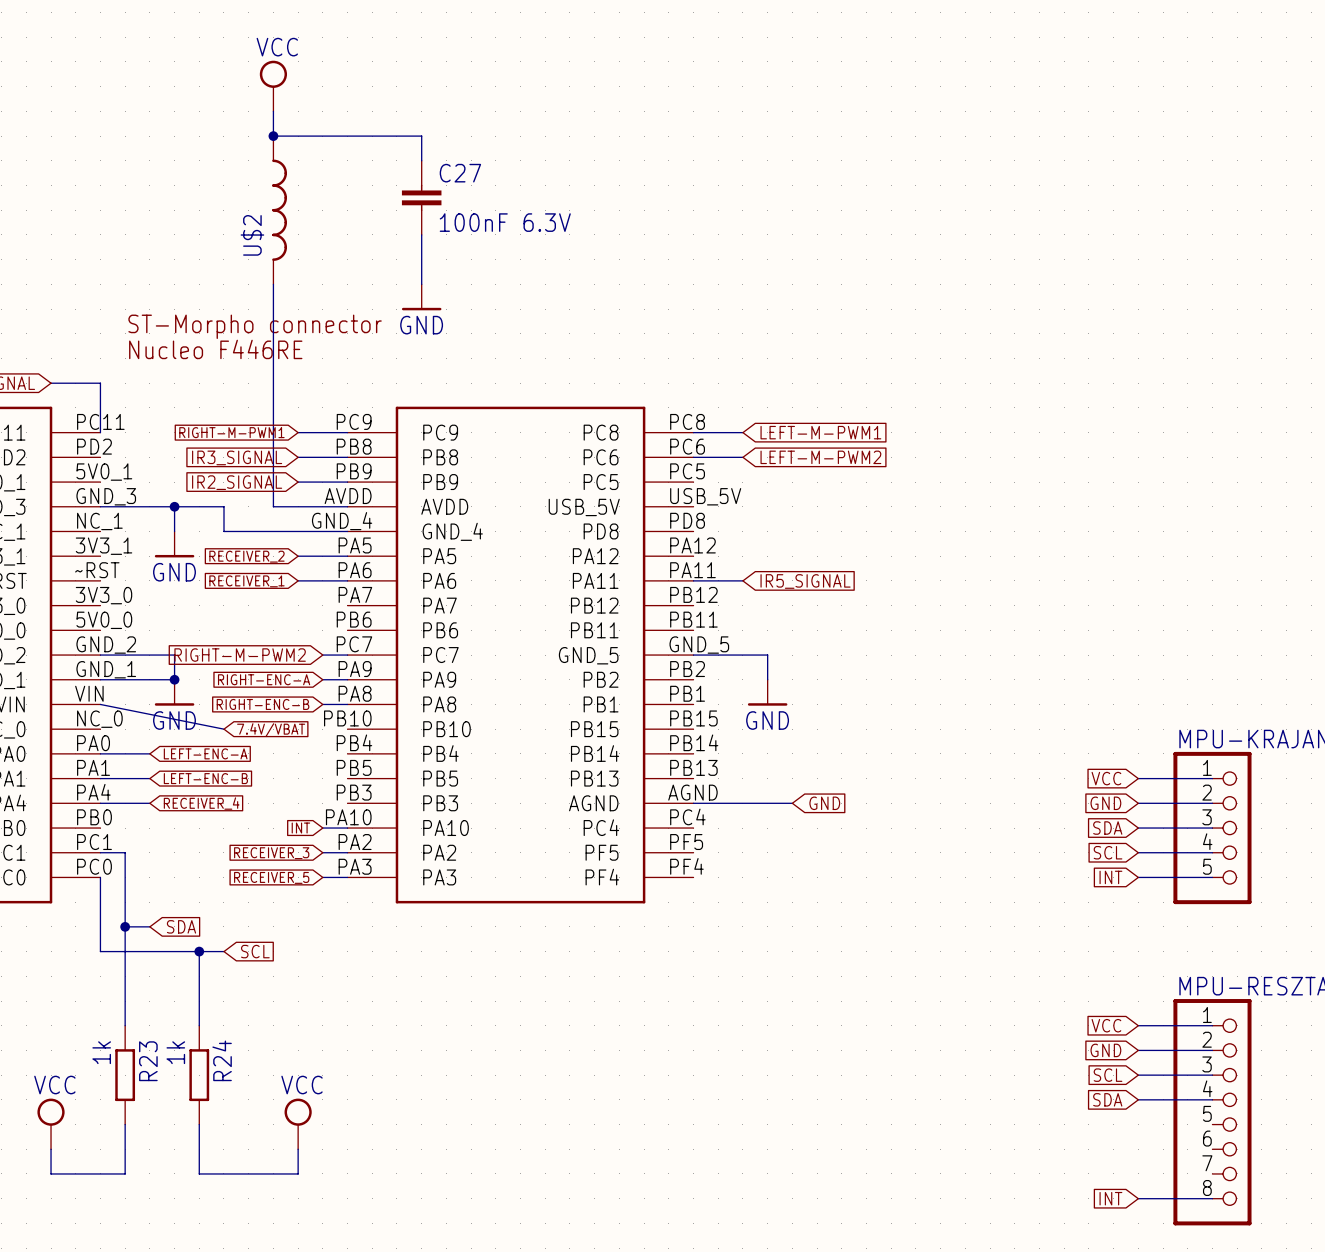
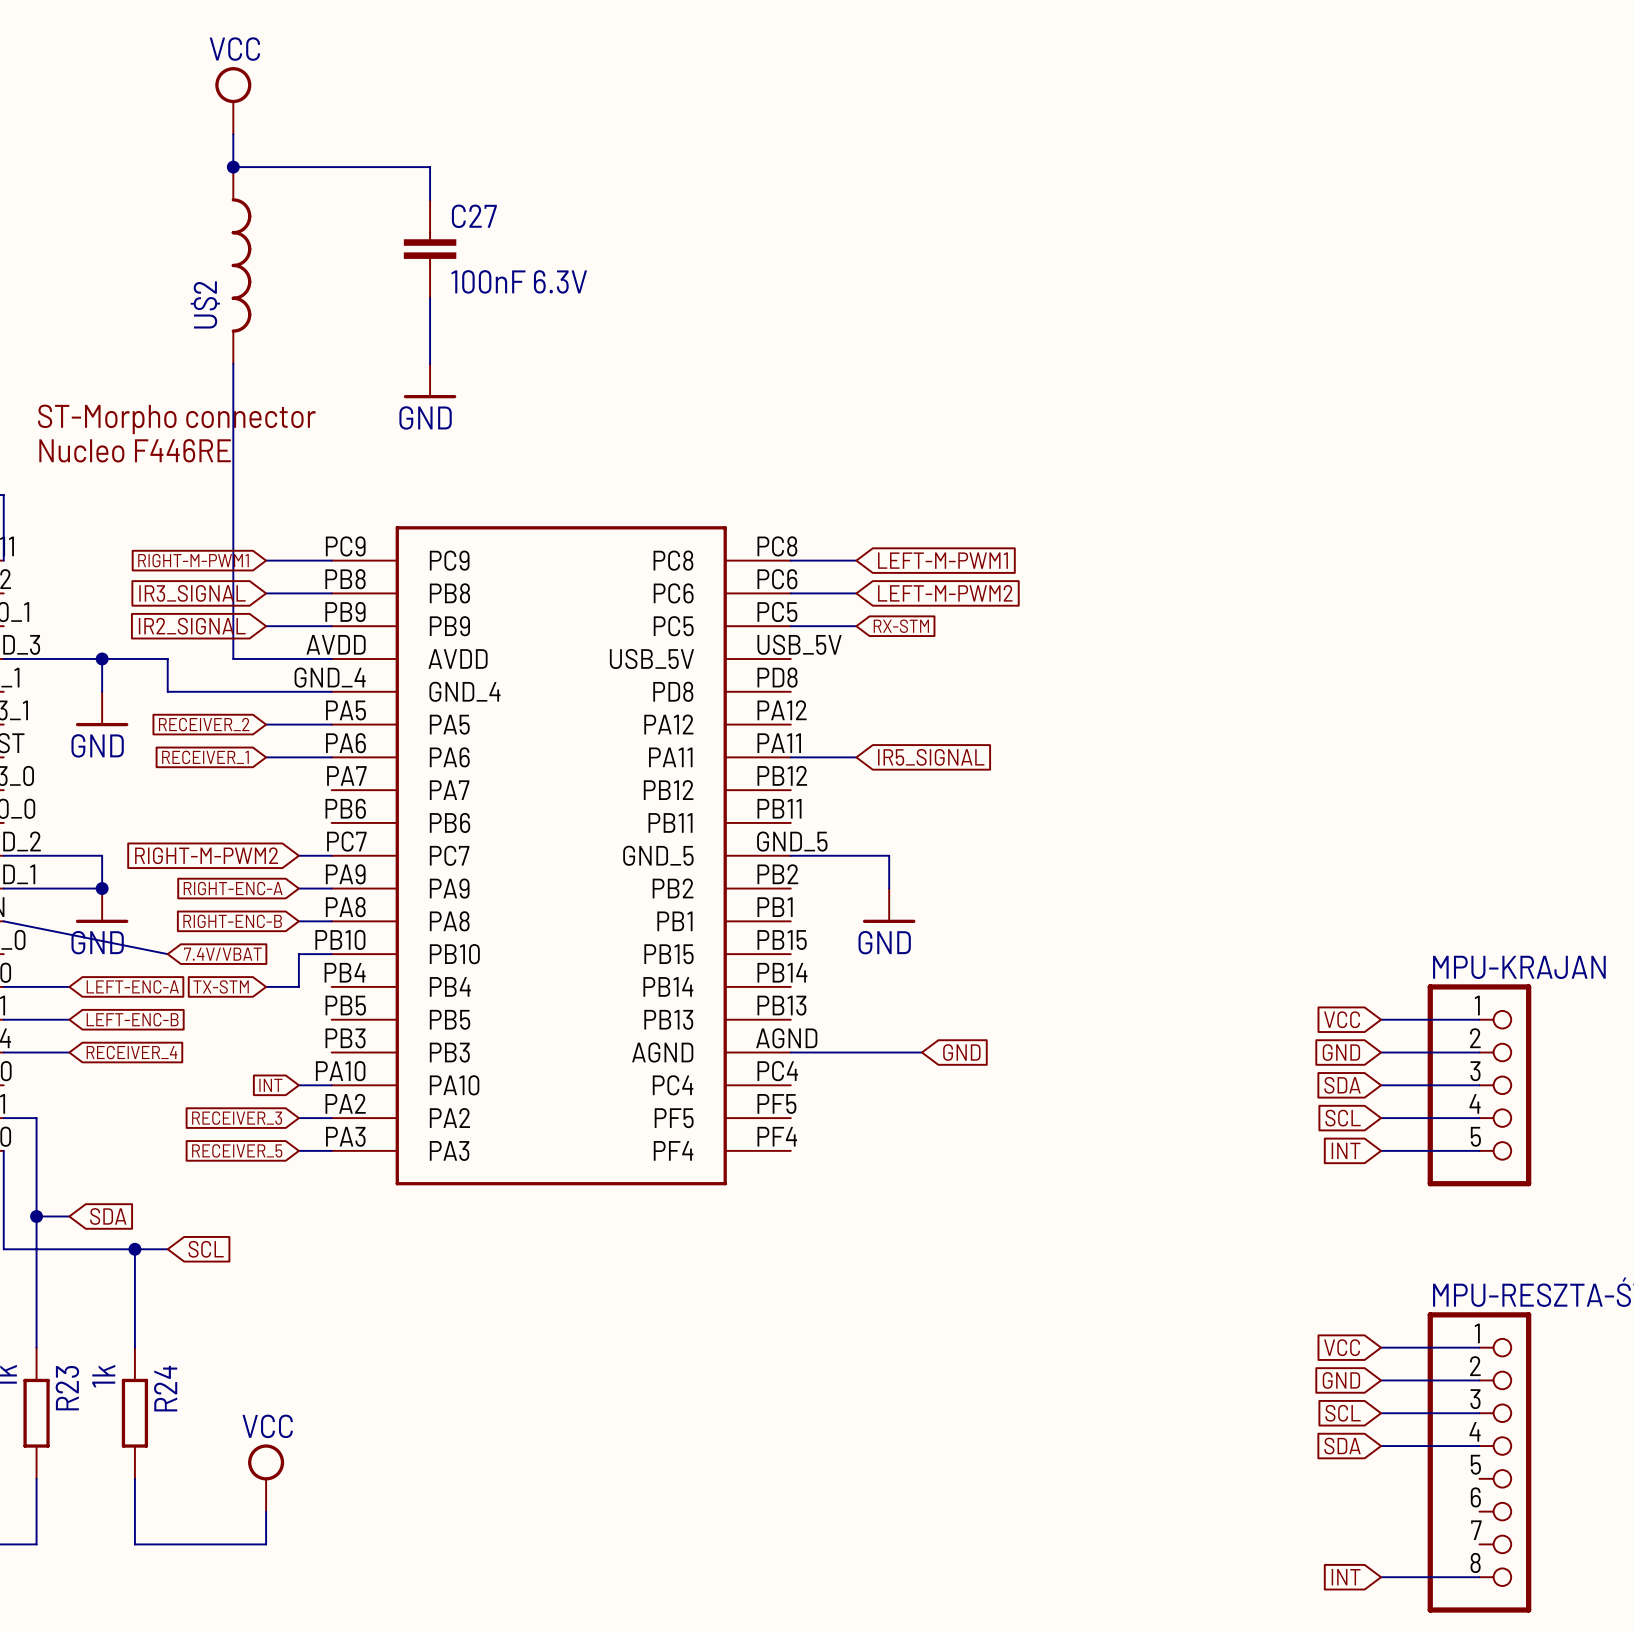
wire: none -> (790, 626) (856, 626)
global label: none -> RX-STM (901, 626)
wire: none -> (331, 954) (298, 954) (298, 986) (266, 986)
global label: none -> TX-STM (221, 986)

